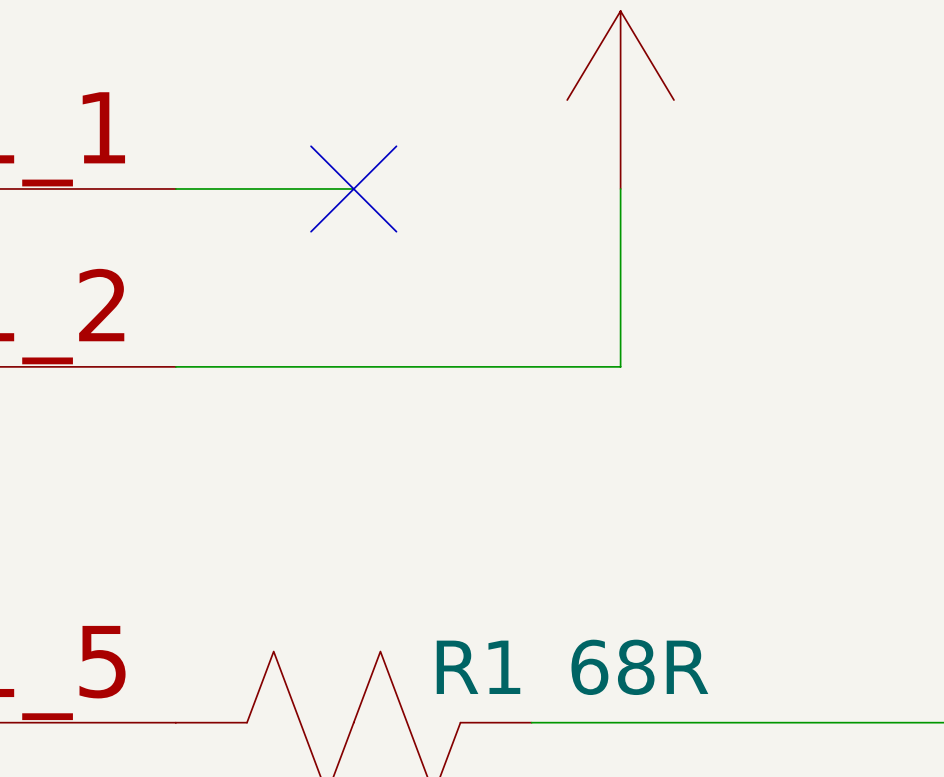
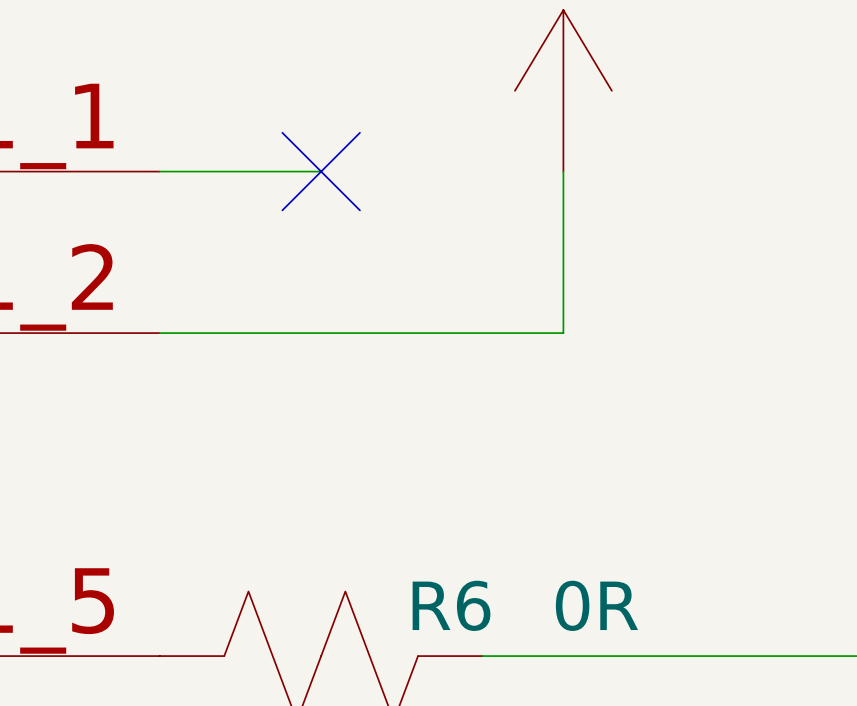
R1 name: R1 (478, 667) -> R6 (451, 605)
R1 value: 68R (639, 667) -> 0R (596, 605)

